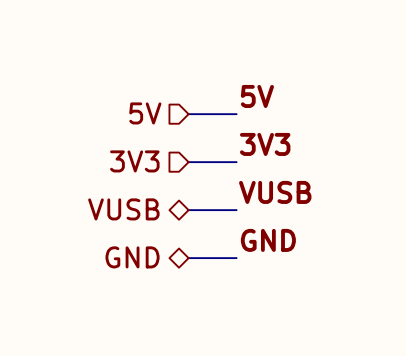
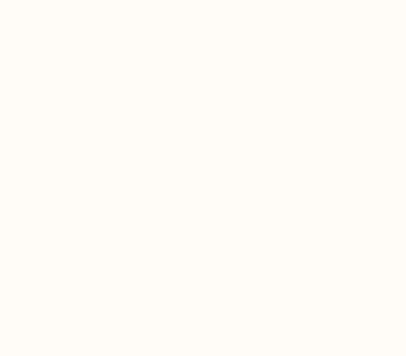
label: 5V (257, 96) -> none
hierarchical label: 5V (145, 113) -> none
wire: (188, 114) (236, 114) -> none
label: 3V3 (265, 144) -> none
hierarchical label: 3V3 (134, 161) -> none
wire: (188, 162) (236, 162) -> none
label: VUSB (275, 192) -> none
hierarchical label: VUSB (123, 209) -> none
wire: (188, 210) (236, 210) -> none
label: GND (268, 240) -> none
hierarchical label: GND (132, 257) -> none
wire: (188, 258) (236, 258) -> none

